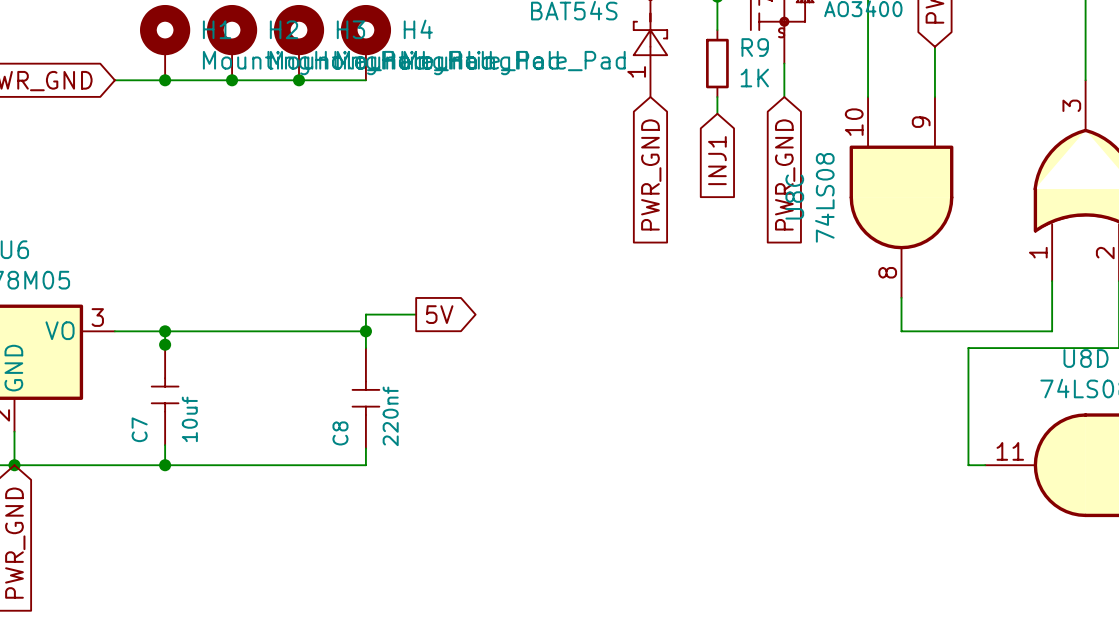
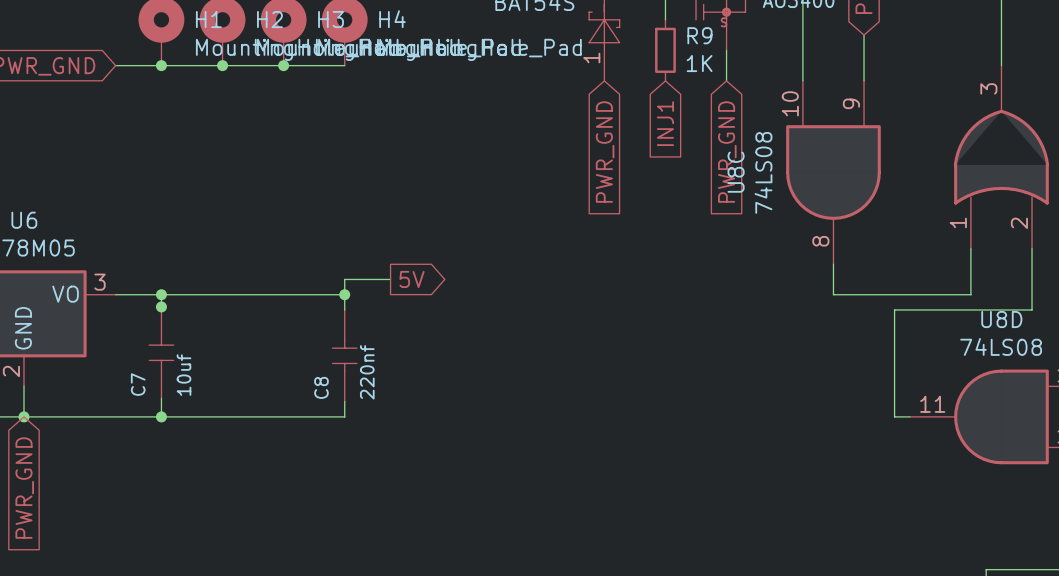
wire: (717, 97) (717, 113) -> none
global label position: INJ1 (717, 160) -> INJ1 (665, 123)

